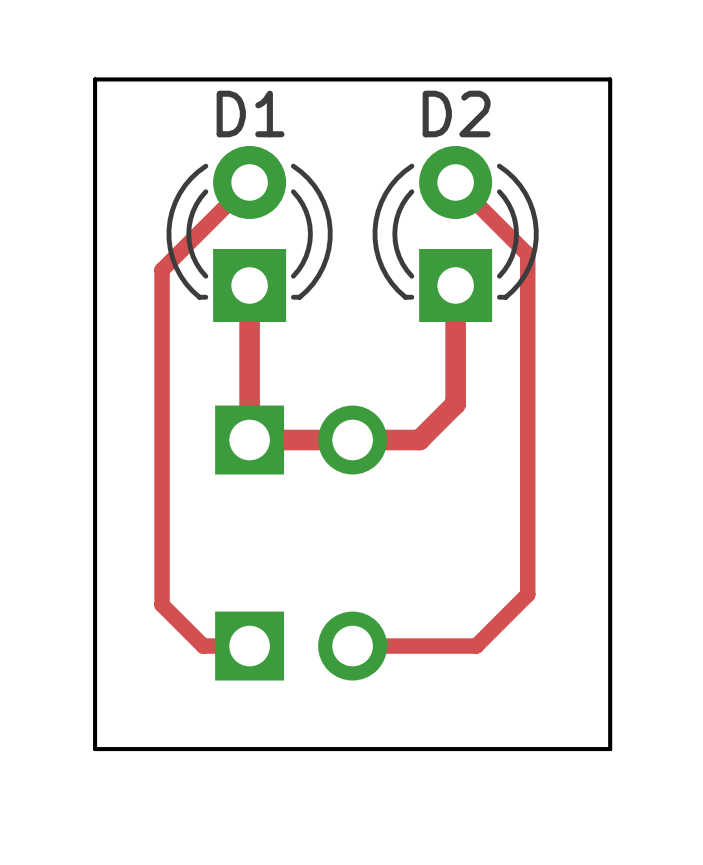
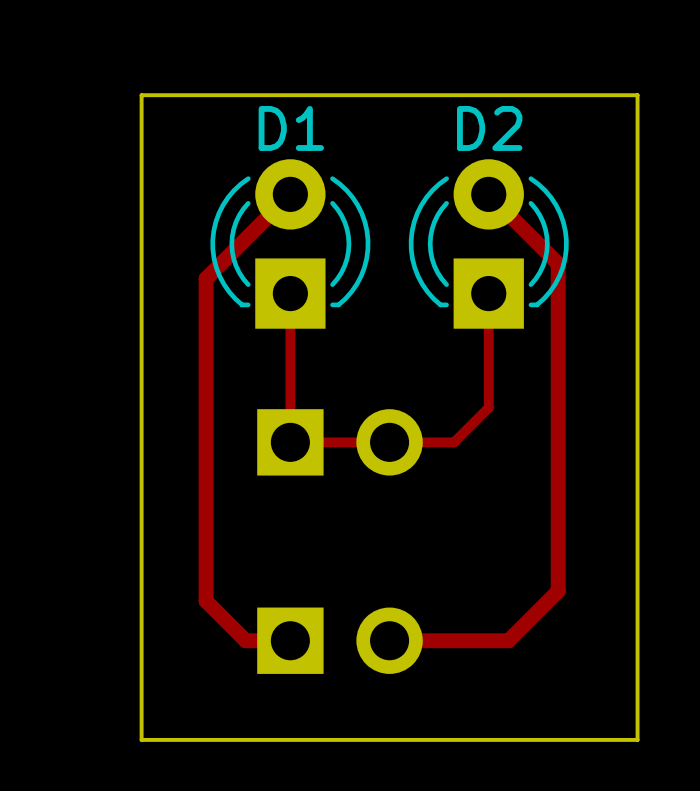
top track width: thick (249, 285) (249, 440) (419, 440) (455, 403) (455, 285) -> thin (290, 293) (290, 442) (454, 442) (488, 407) (488, 293)

